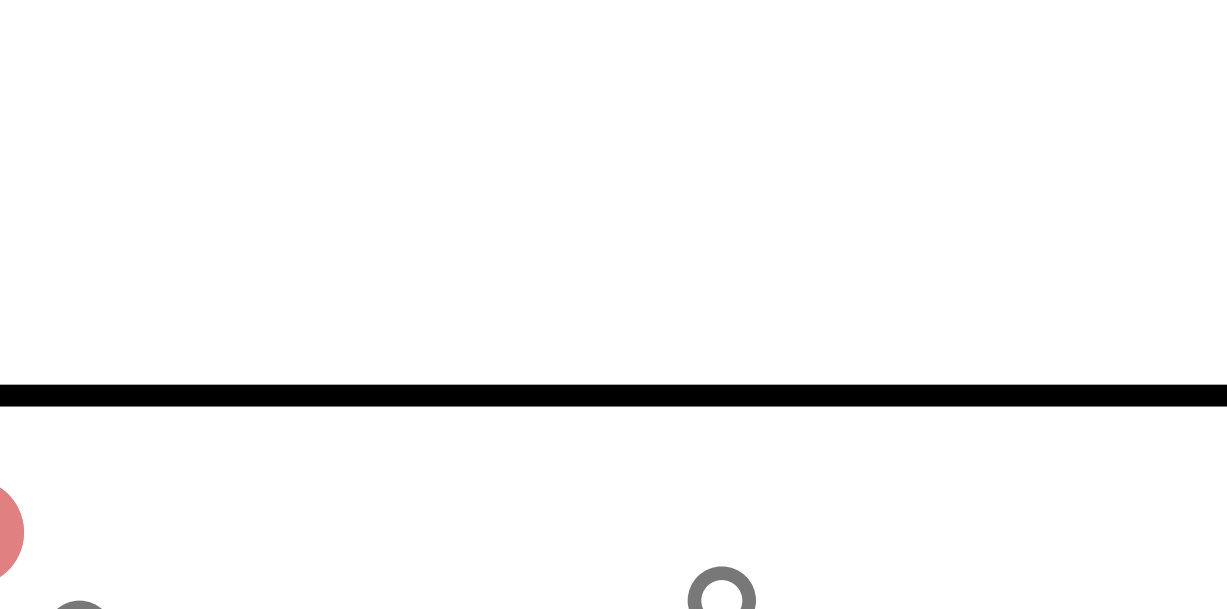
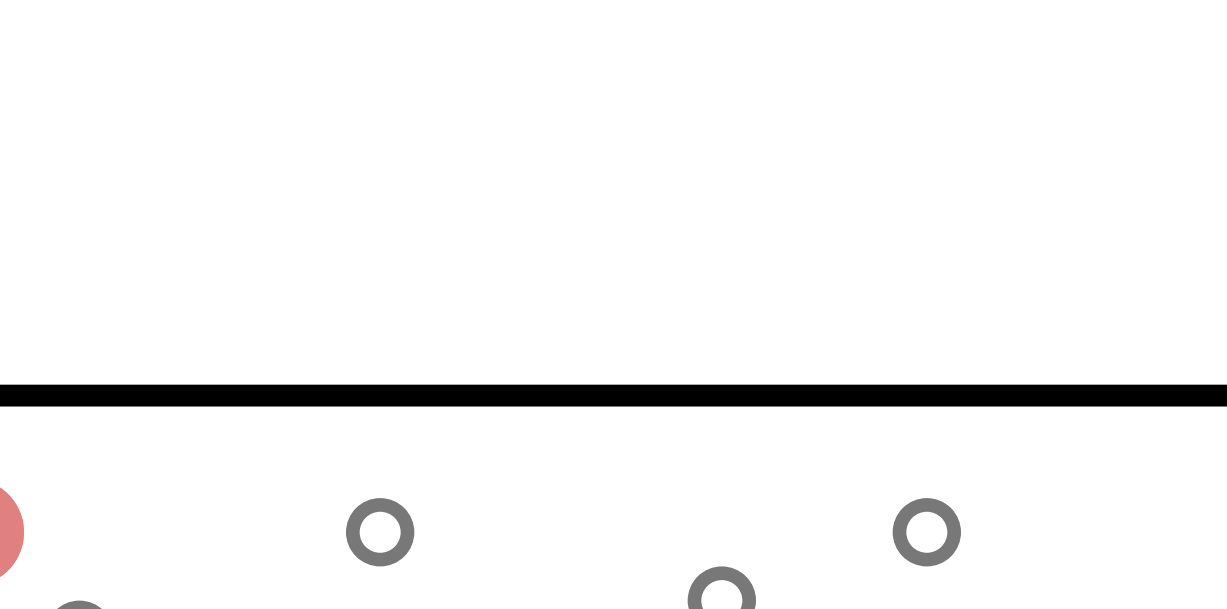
via: none -> (380, 532)
via: none -> (926, 532)

